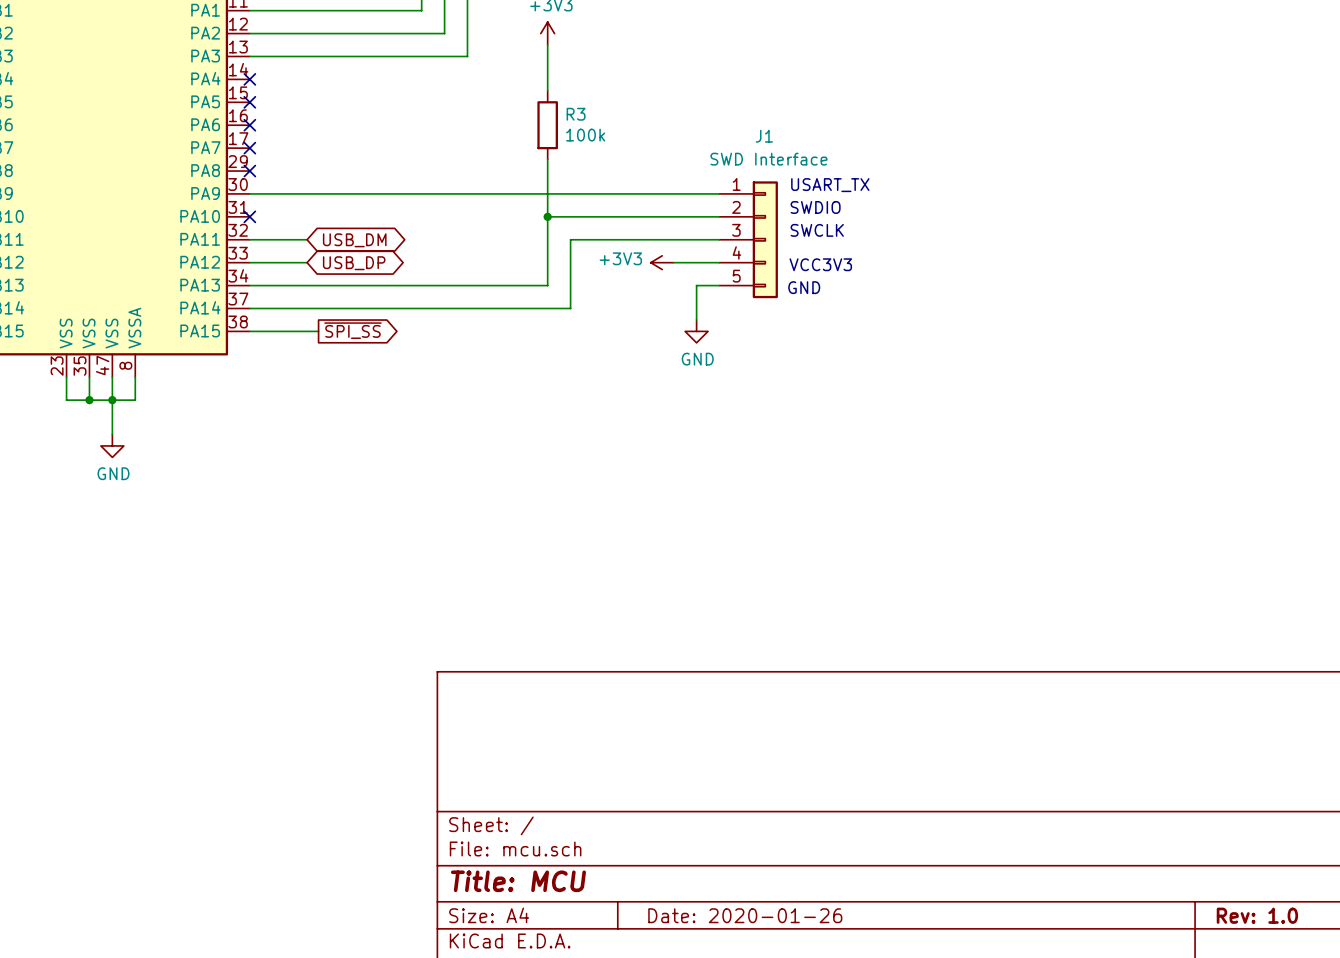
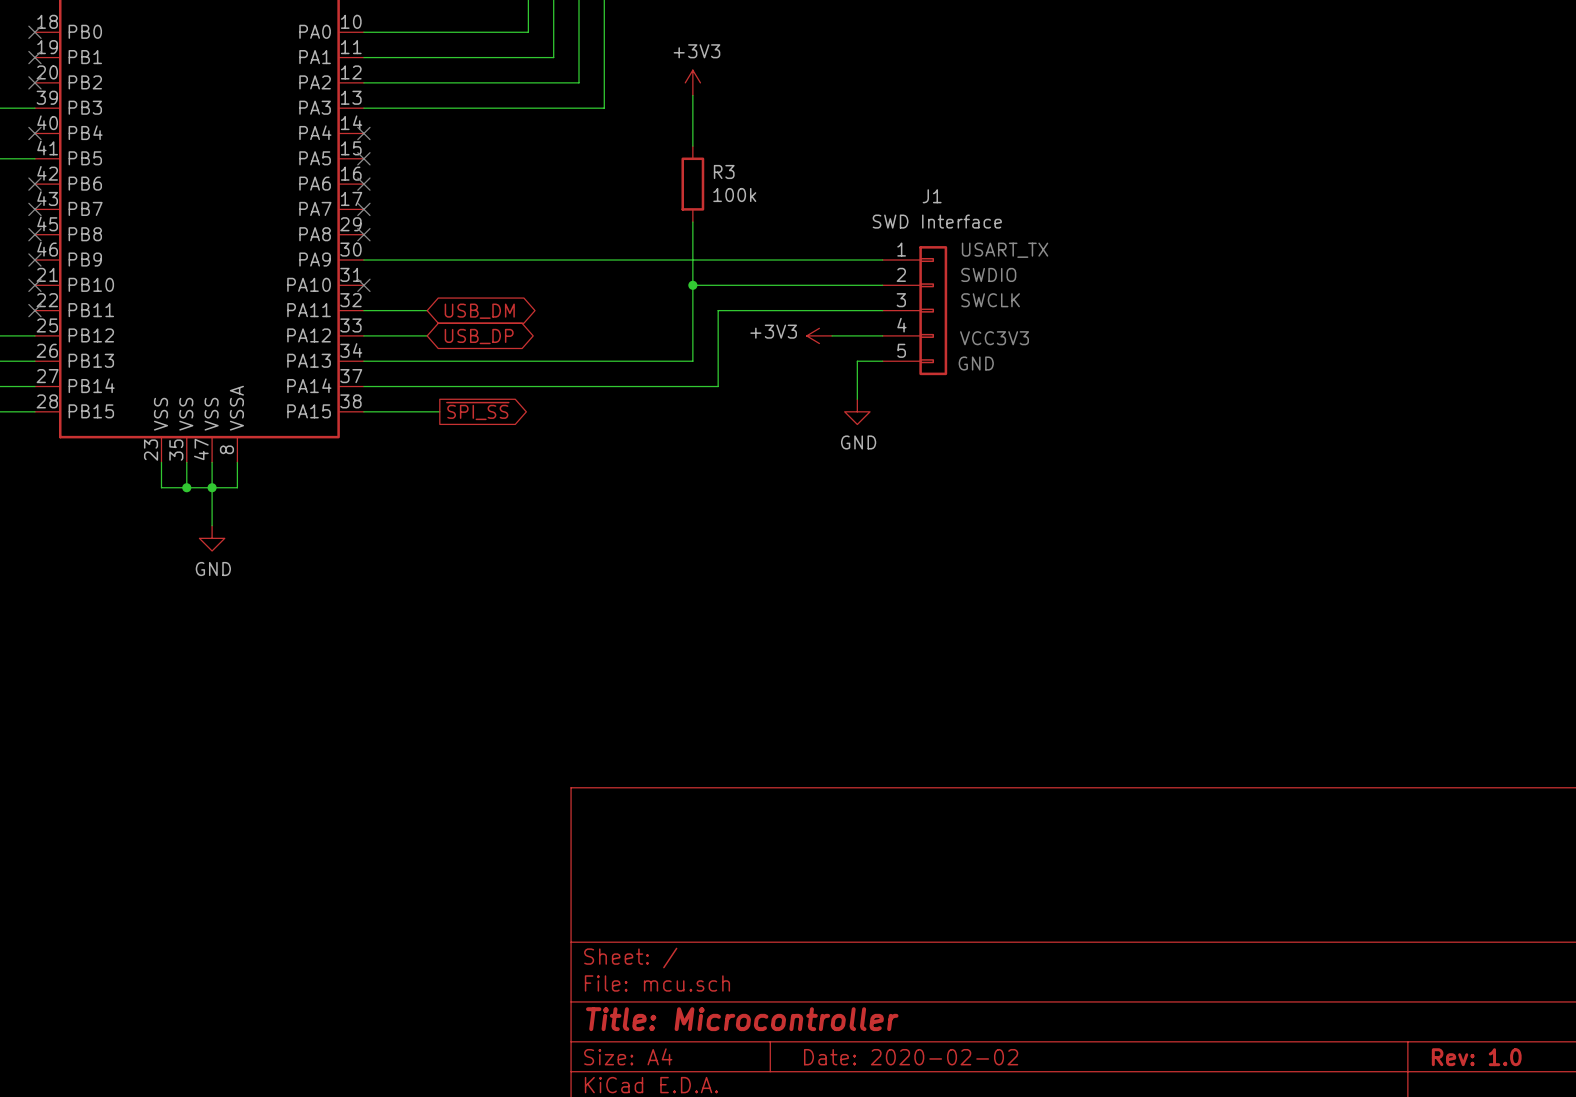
title block: Title: MCU (518, 881) -> Title: Microcontroller (742, 1019)
title block: Date: 2020-01-26 (745, 915) -> Date: 2020-02-02 (911, 1057)

